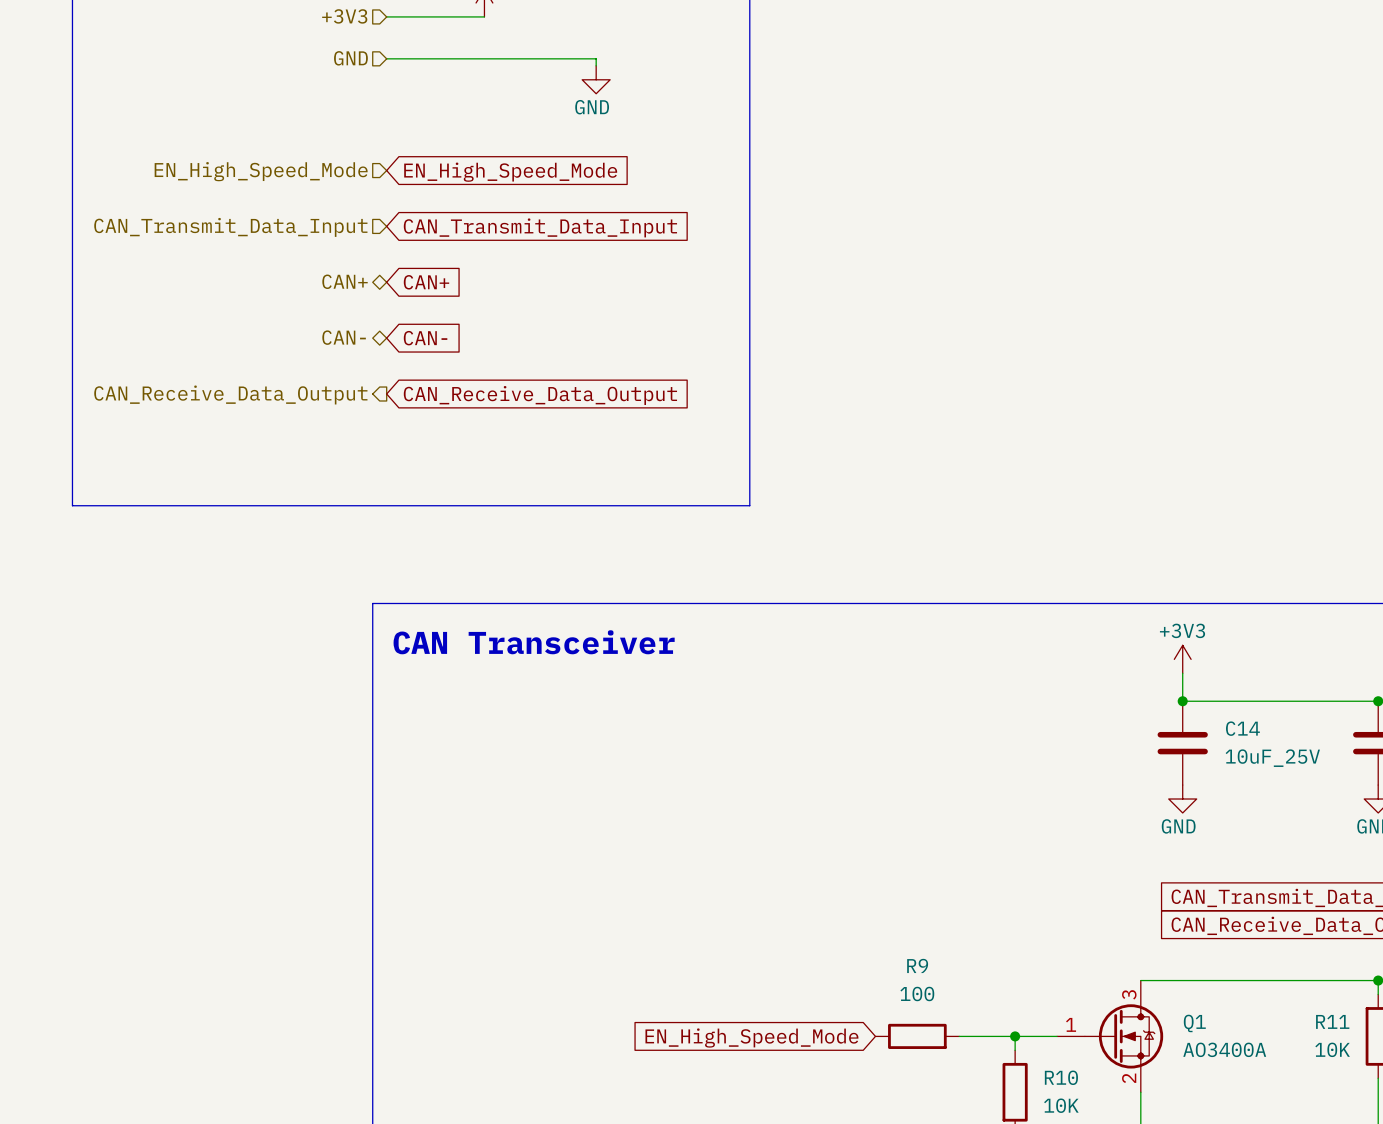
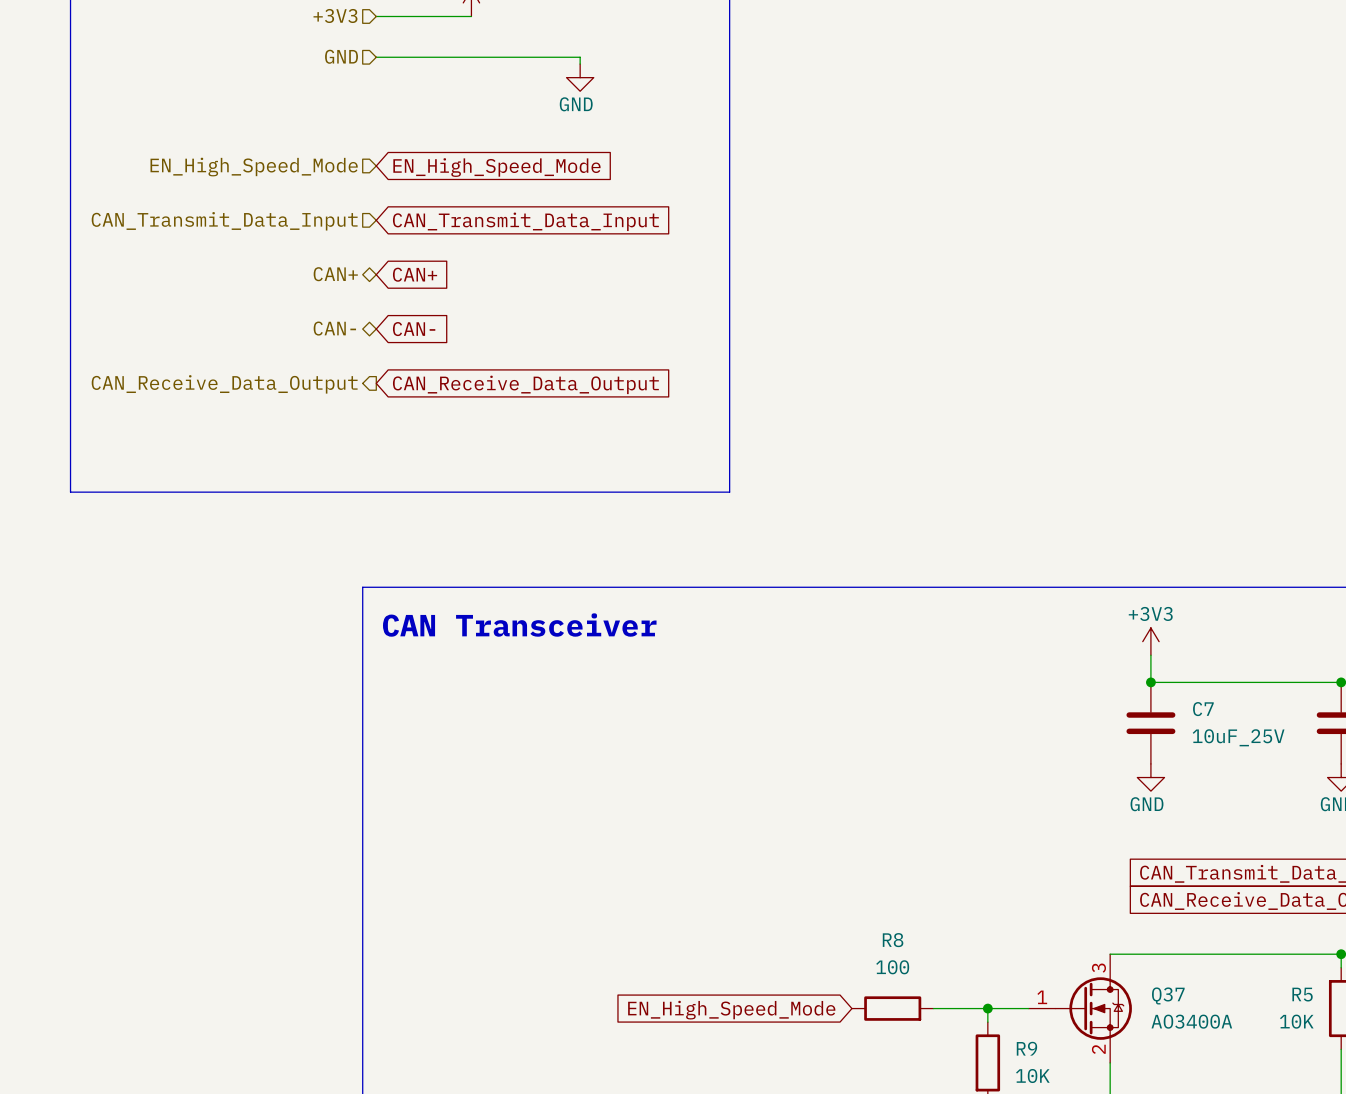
C14 name: C14 (1242, 728) -> C7 (1203, 709)
R9 name: R9 (917, 965) -> R8 (893, 940)
R11 name: R11 (1332, 1021) -> R5 (1302, 994)
Q1 name: Q1 (1194, 1023) -> Q37 (1168, 995)
R10 name: R10 (1061, 1077) -> R9 (1026, 1048)

